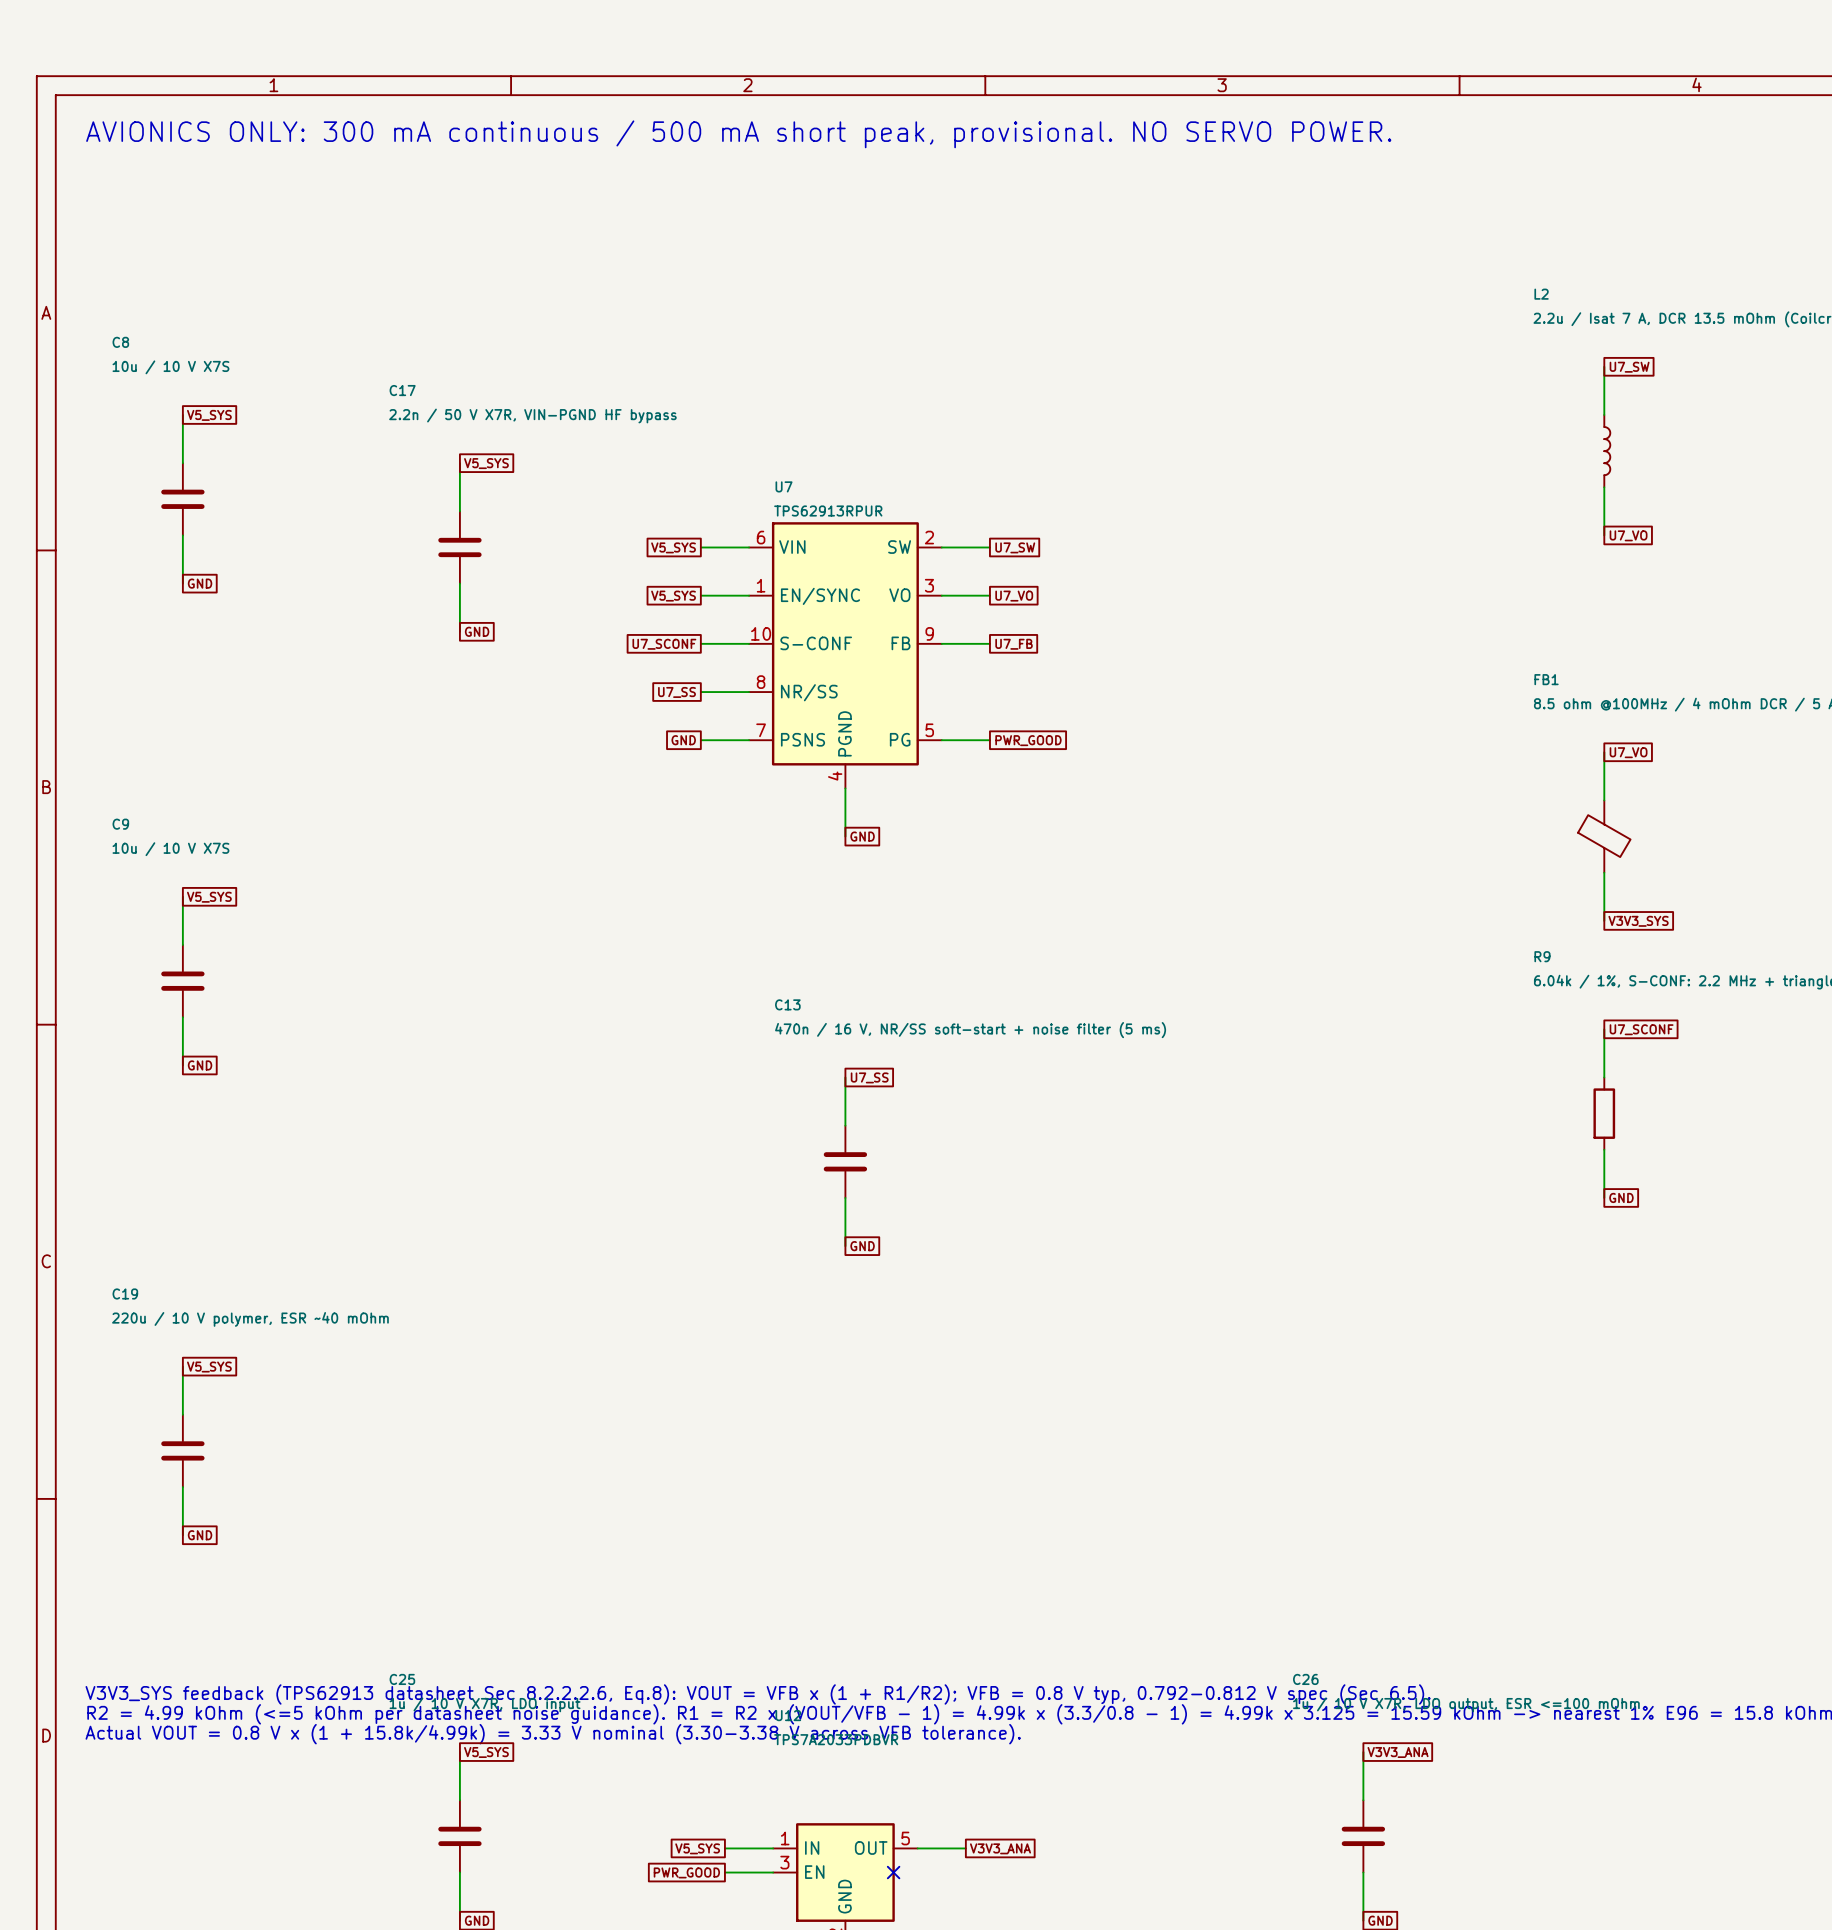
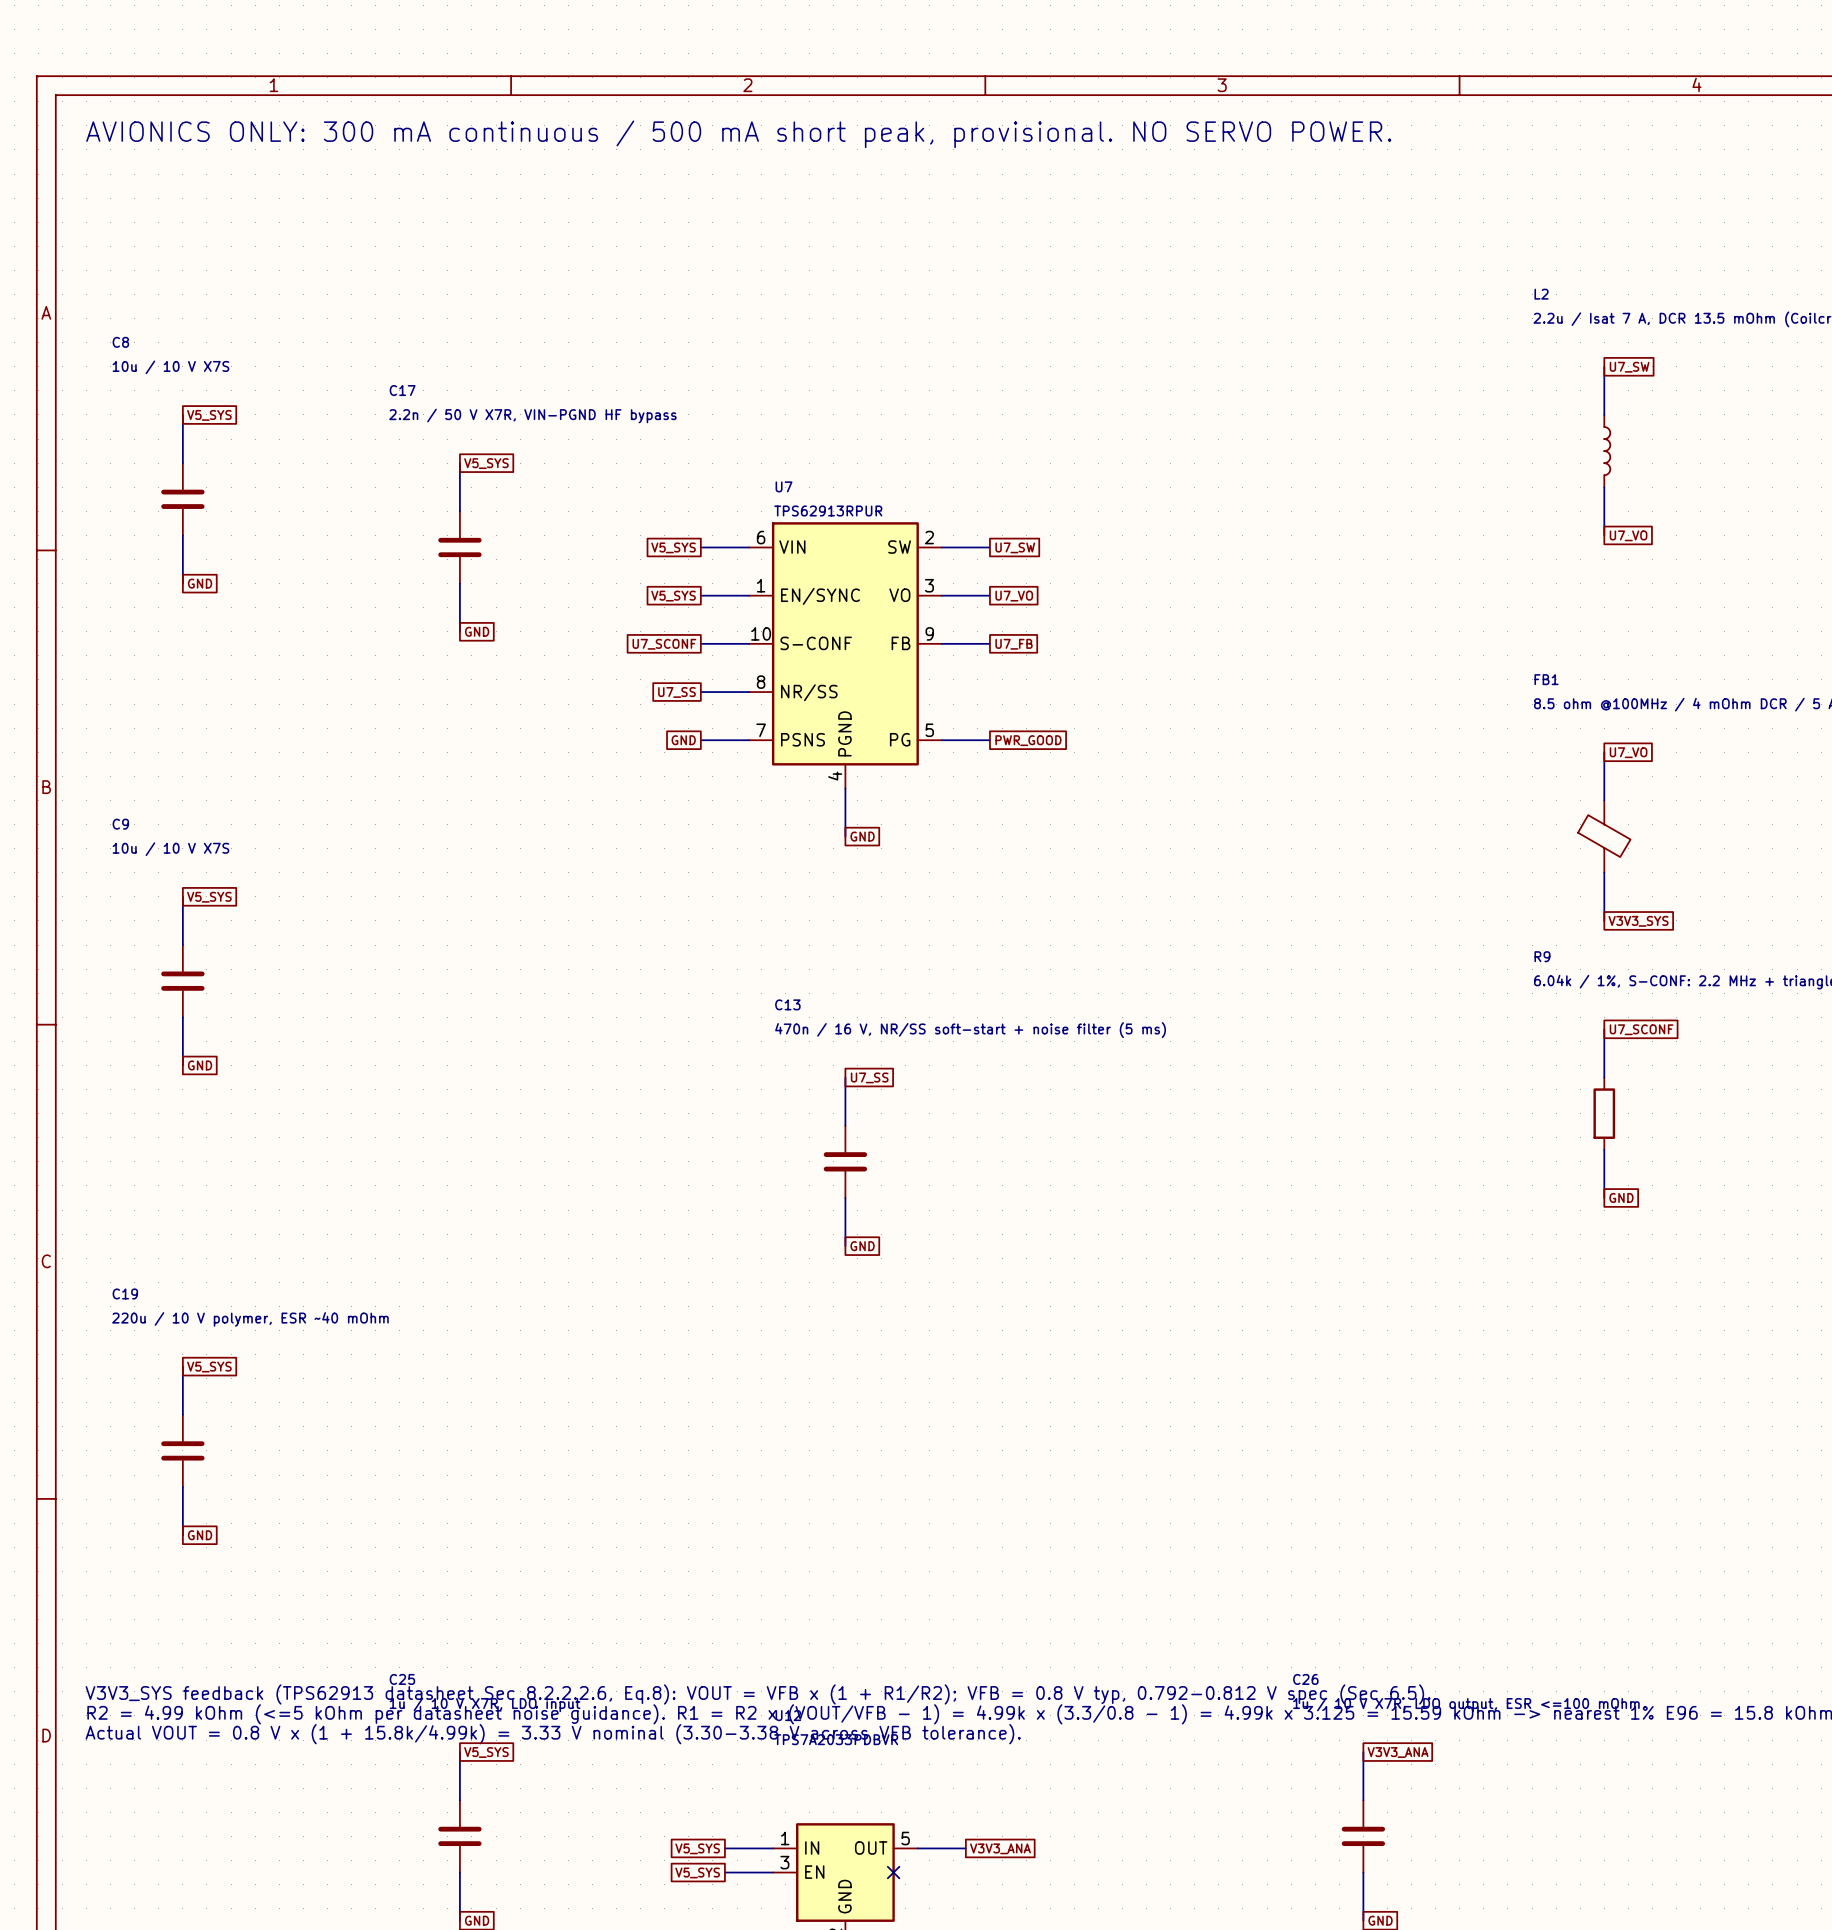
global label: PWR_GOOD (686, 1872) -> V5_SYS (697, 1872)

